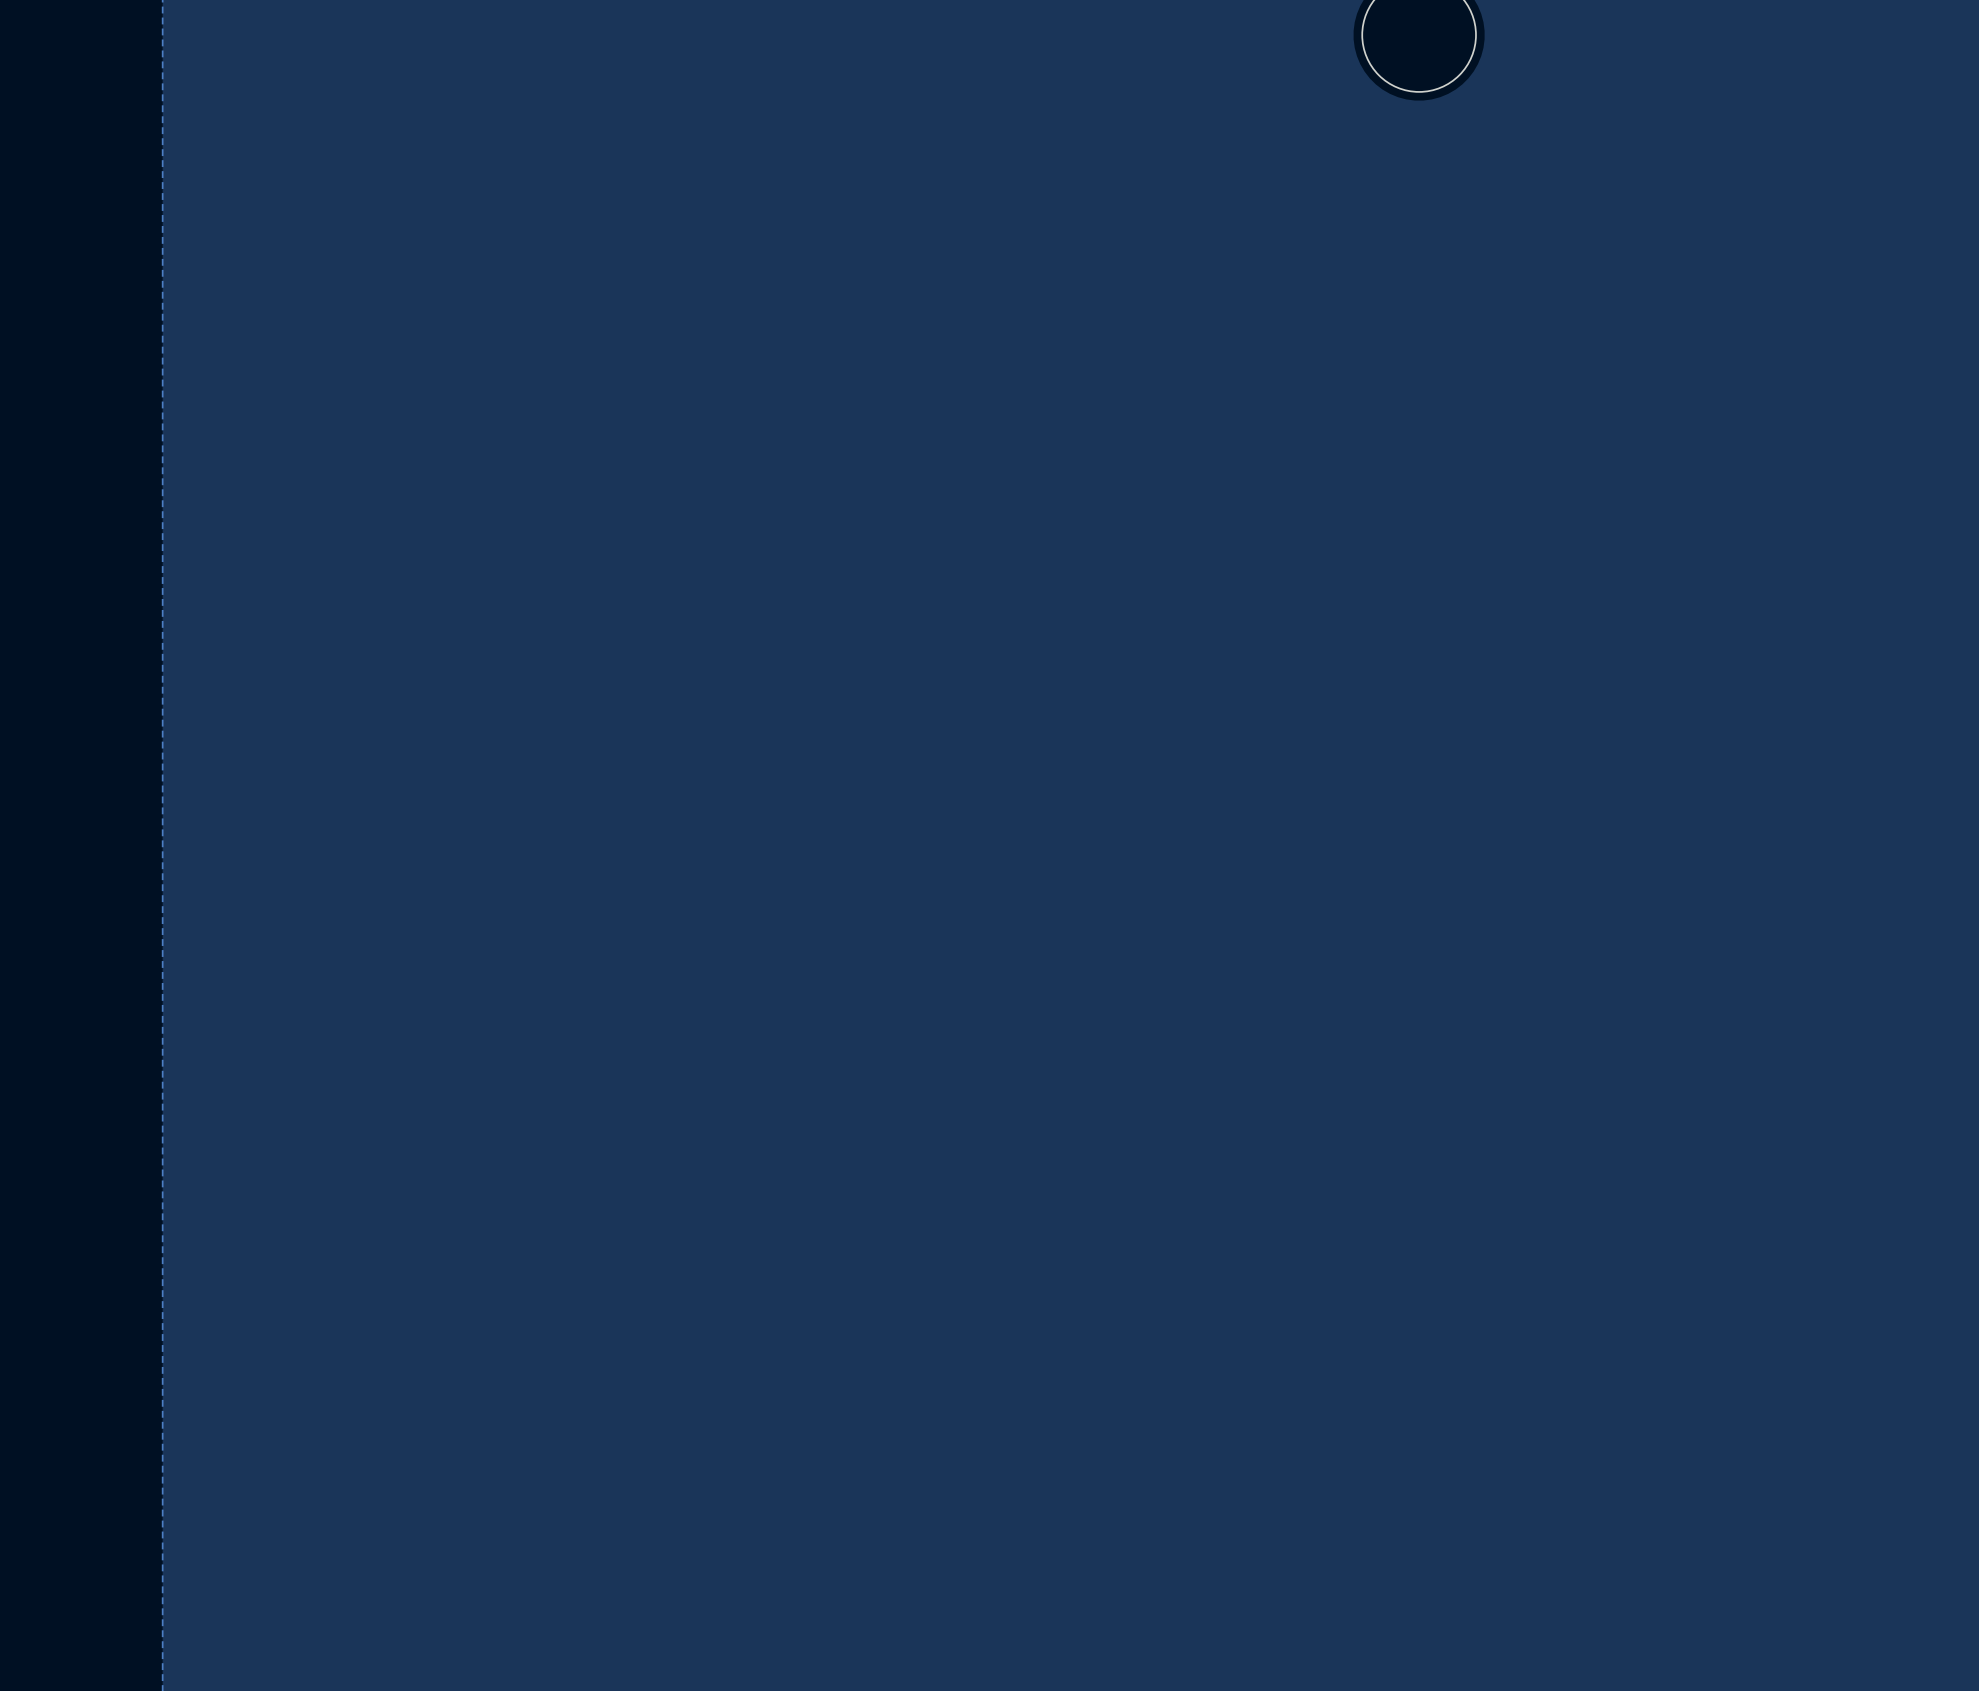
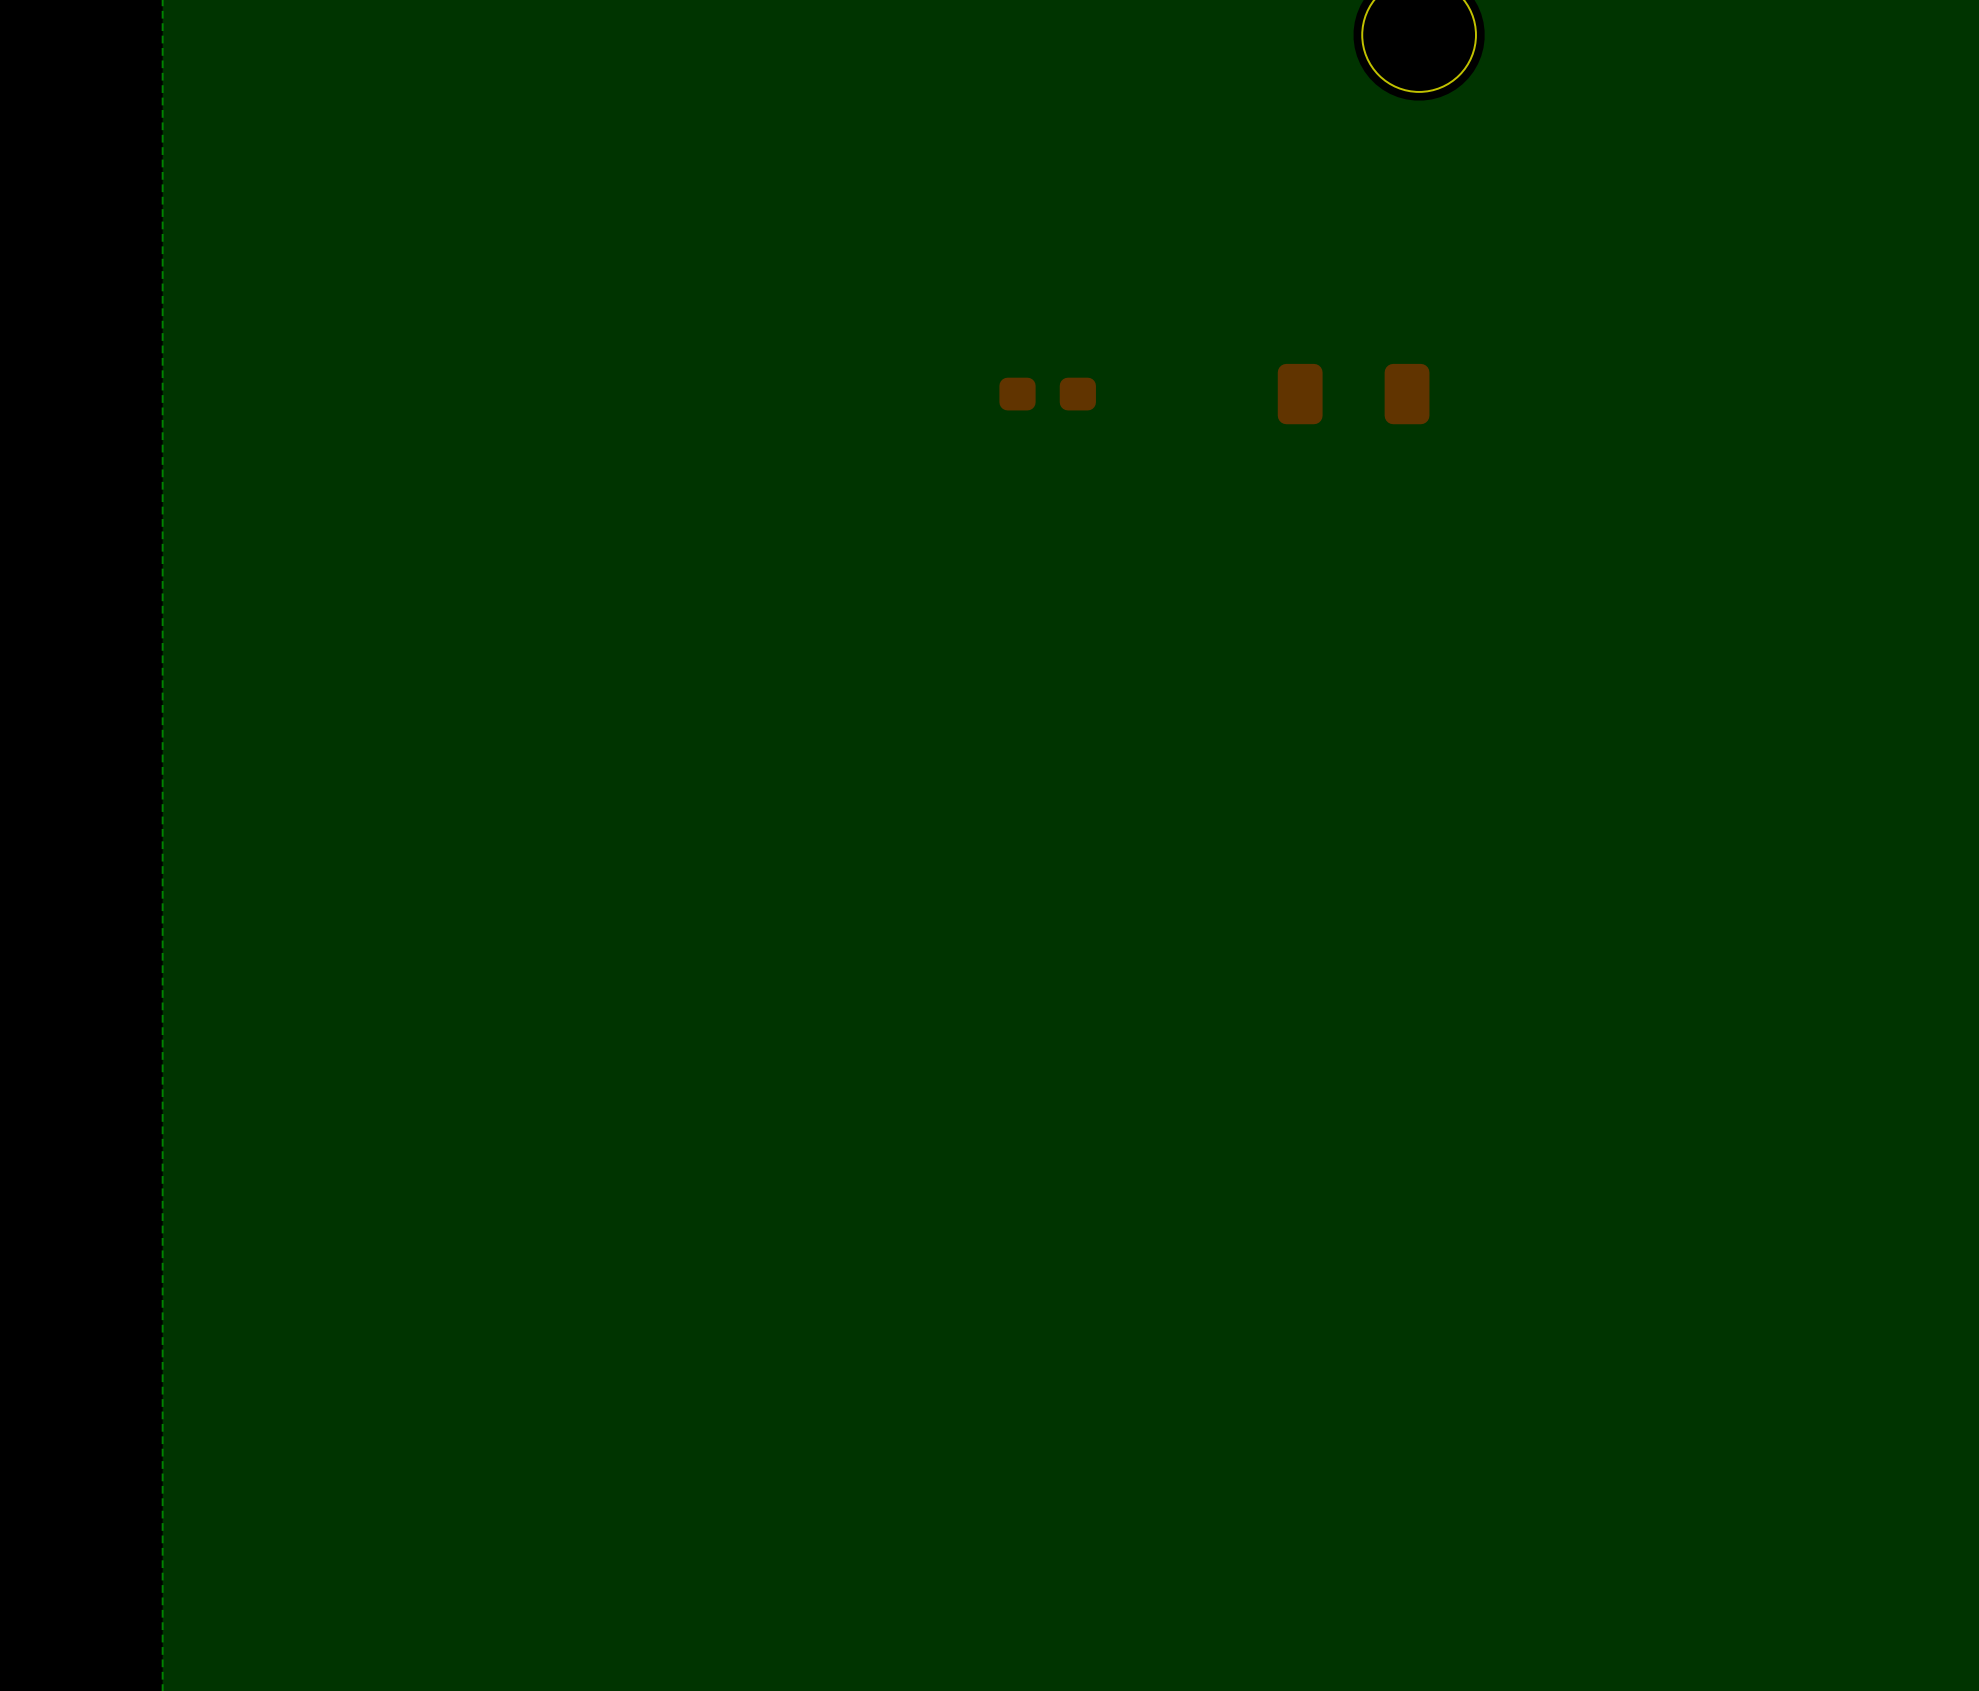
part: none -> (1047, 394)
part: none -> (1353, 394)

